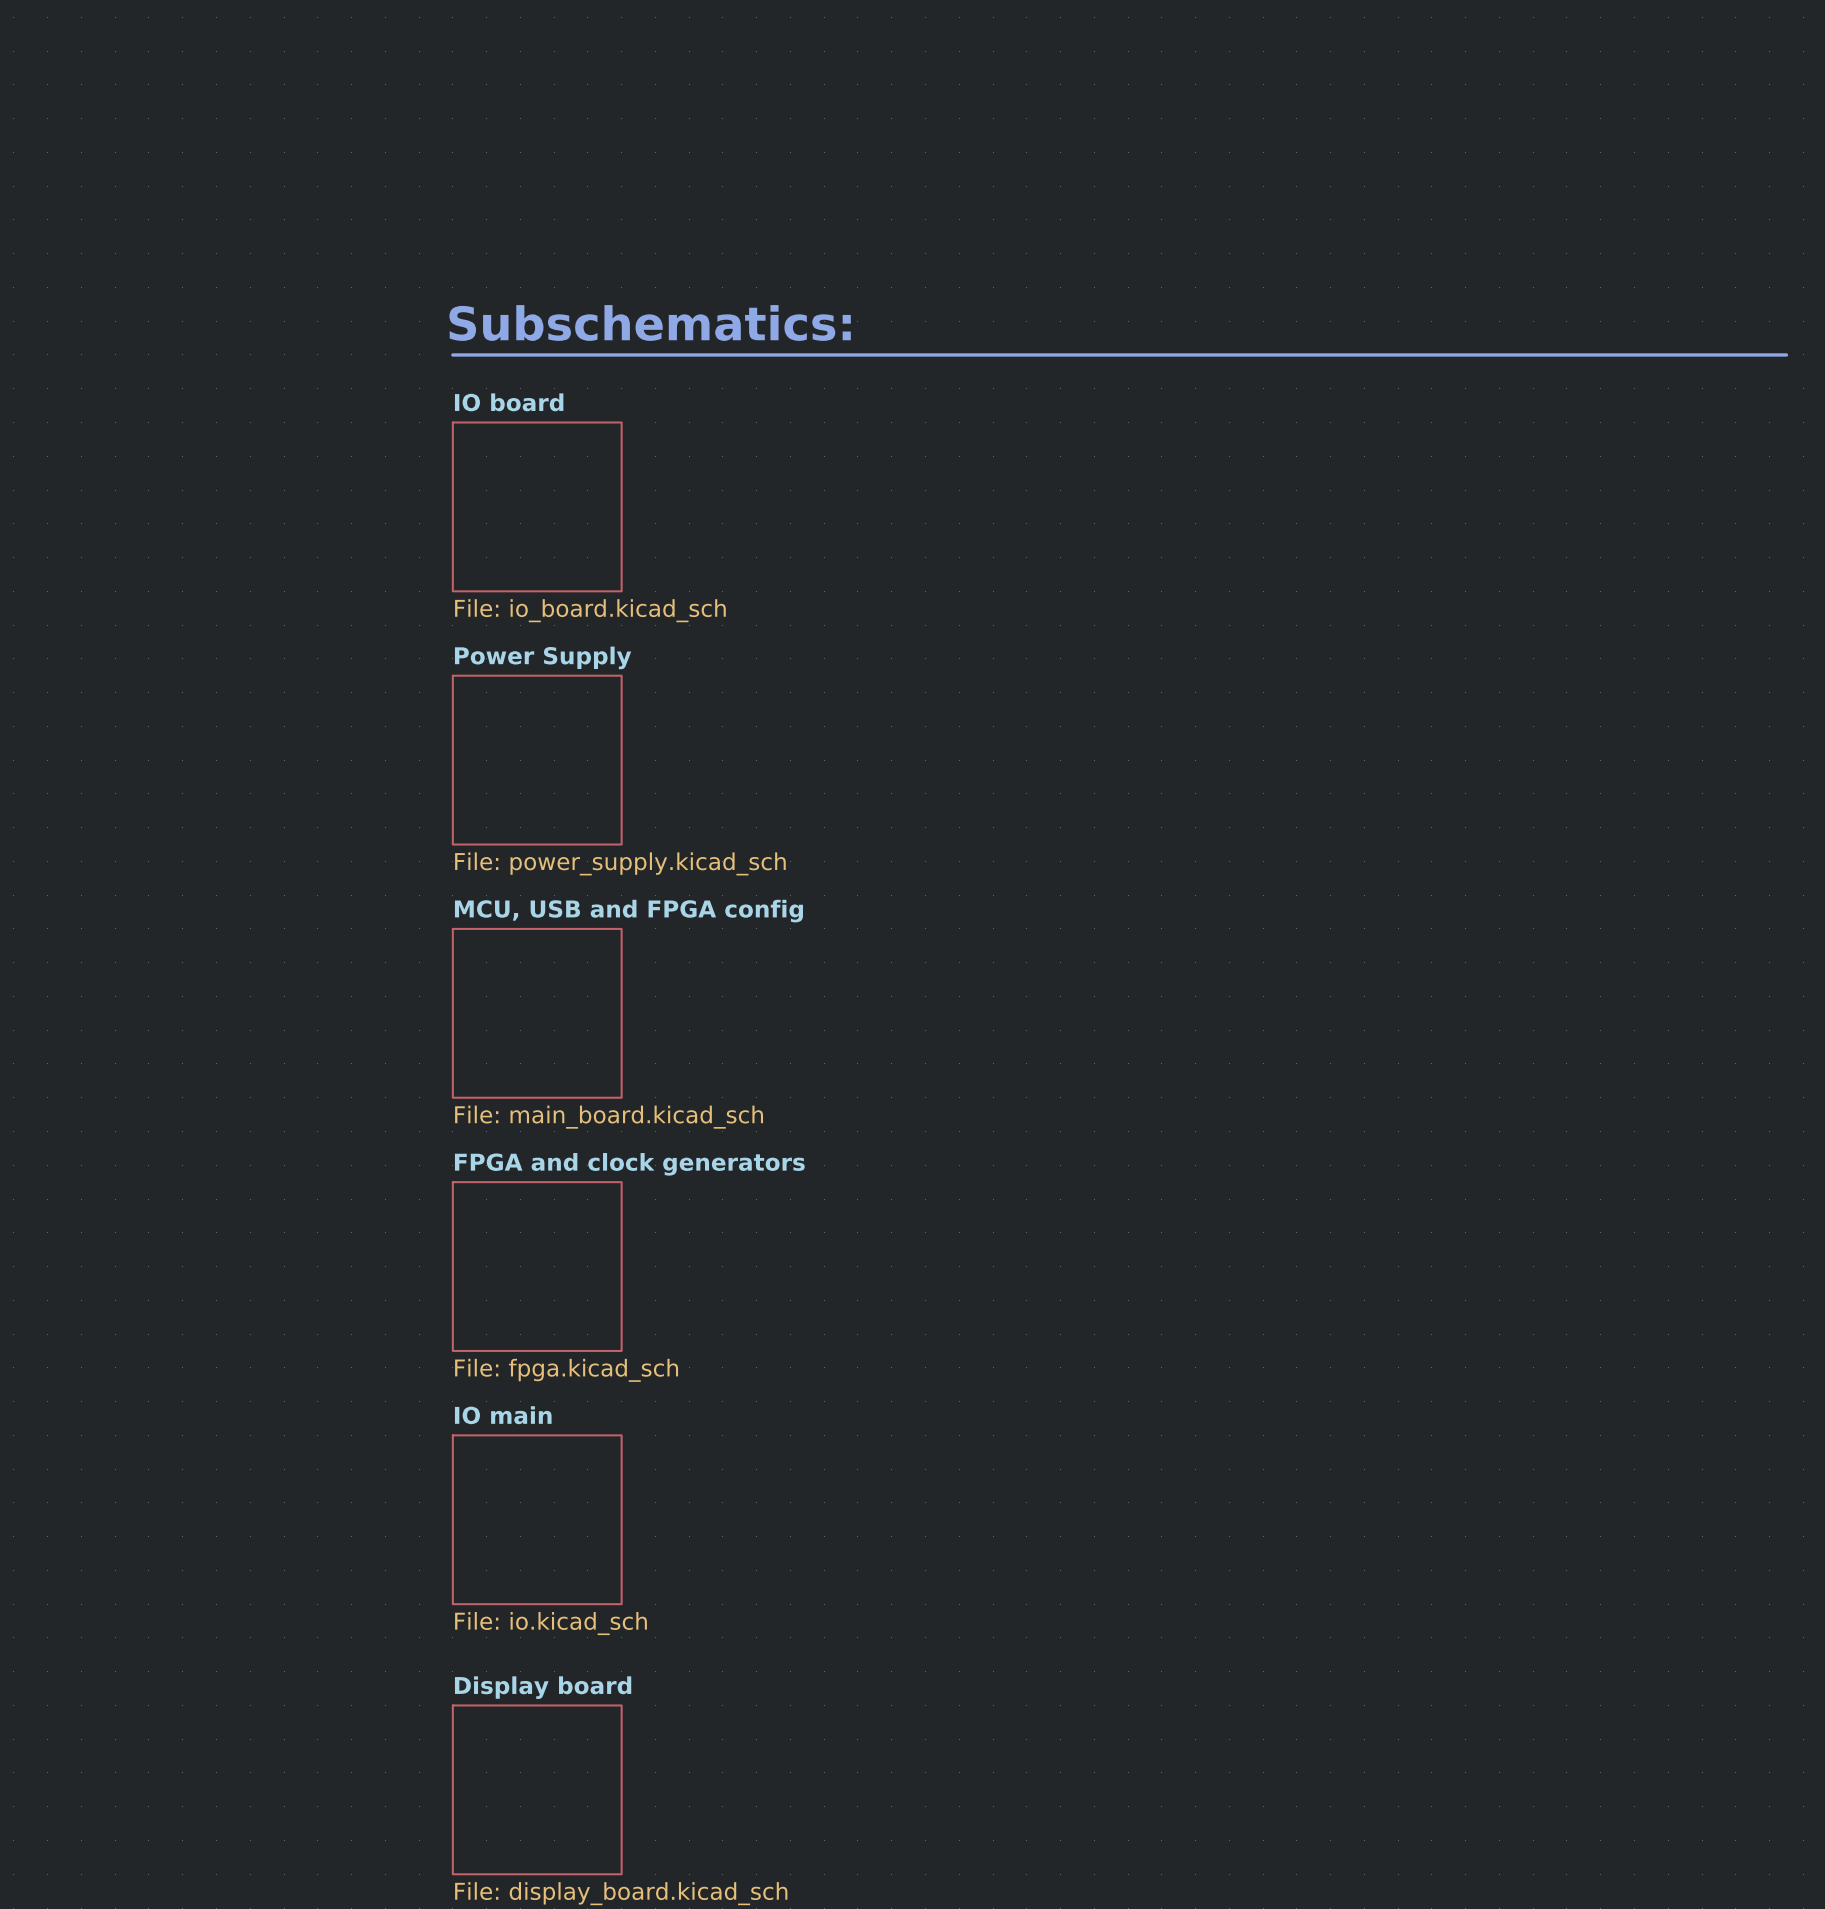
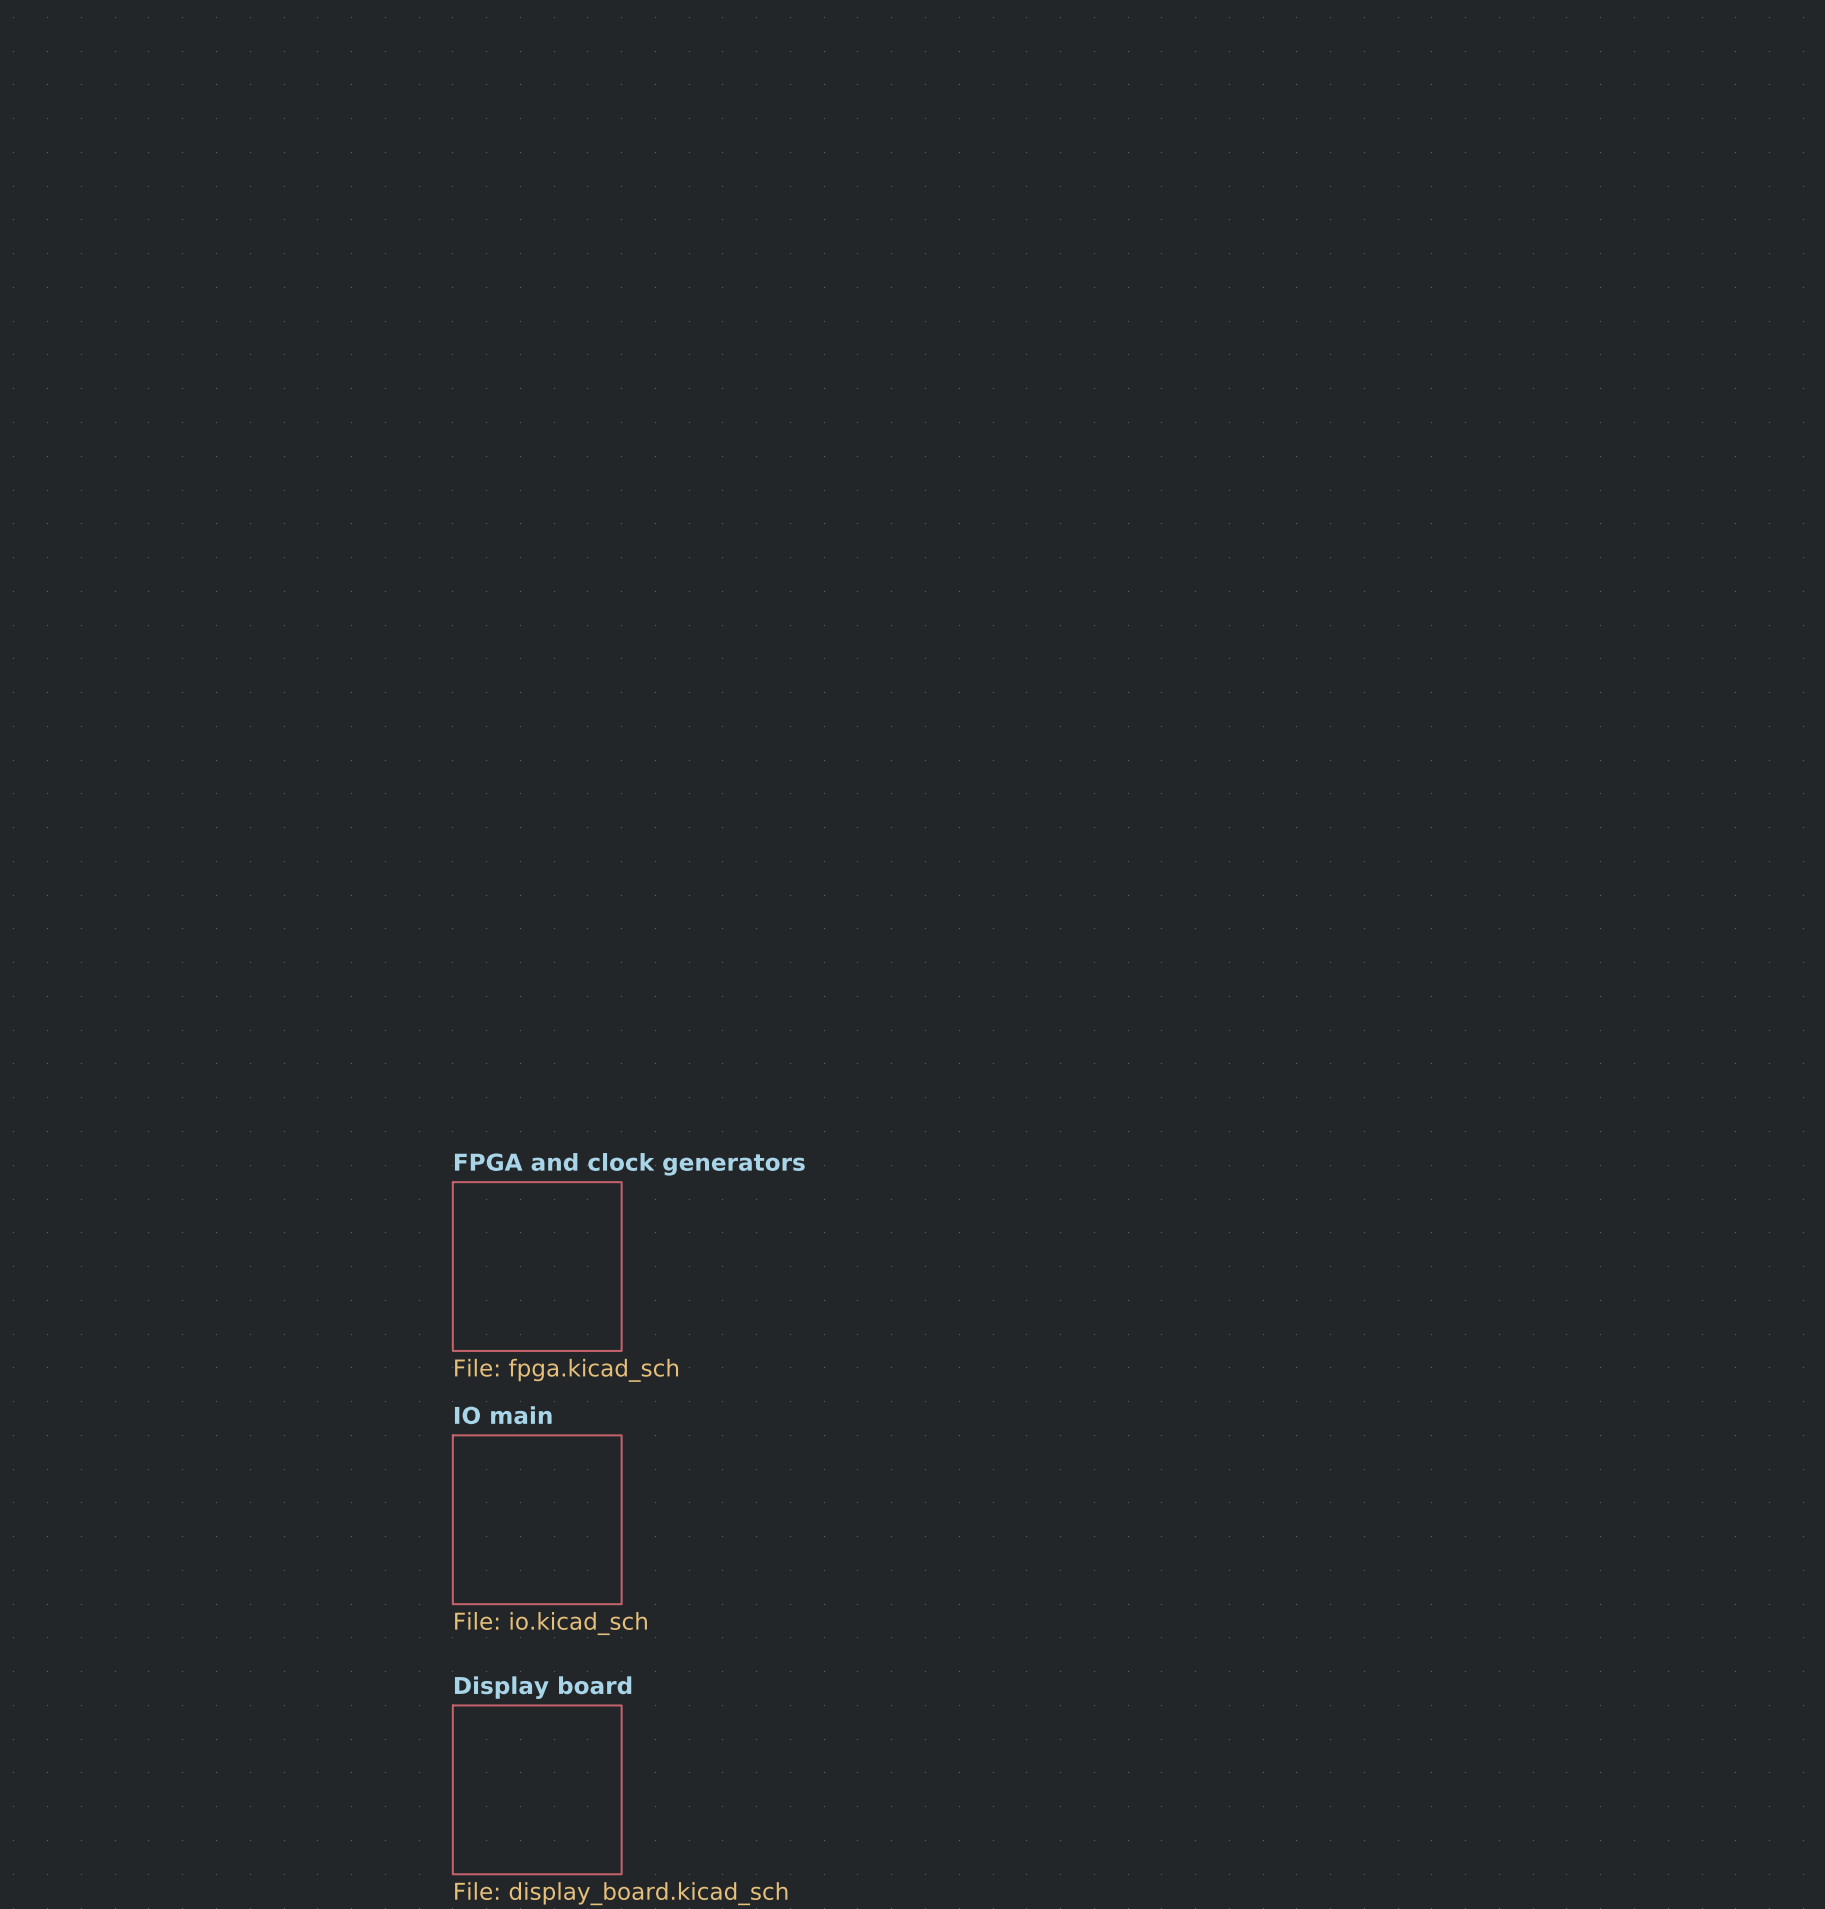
text: Subschematics: (650, 322) -> none
line: (452, 354) (1786, 354) -> none
sheet IO board: File: io_board.kicad_sch (537, 506) -> none
sheet Power Supply: File: power_supply.kicad_sch (537, 760) -> none
sheet MCU, USB and FPGA config: File: main_board.kicad_sch (537, 1013) -> none

